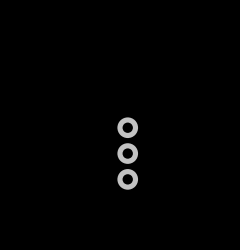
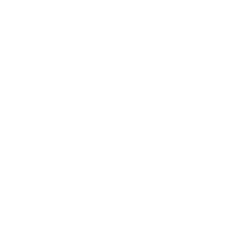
via: (127, 127) -> none
via: (127, 153) -> none
via: (127, 179) -> none

